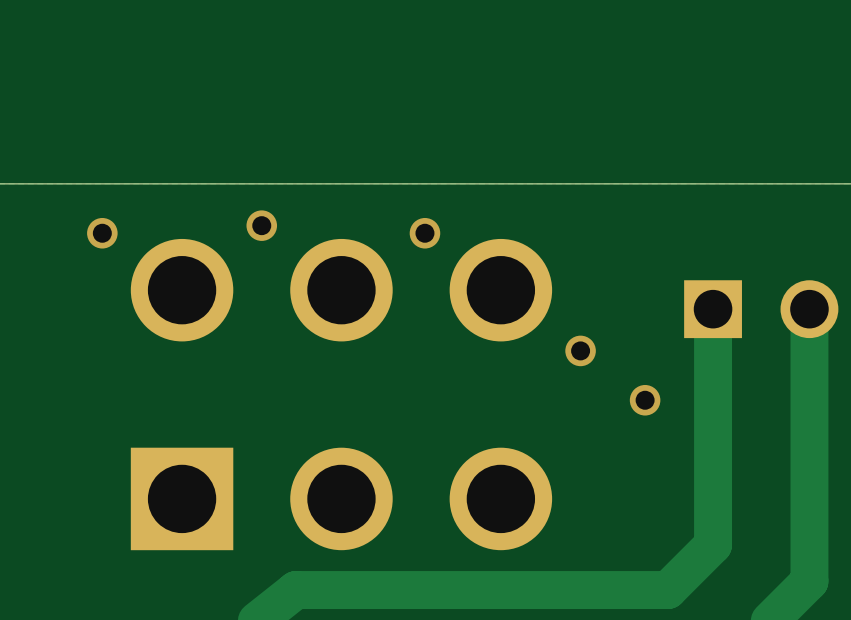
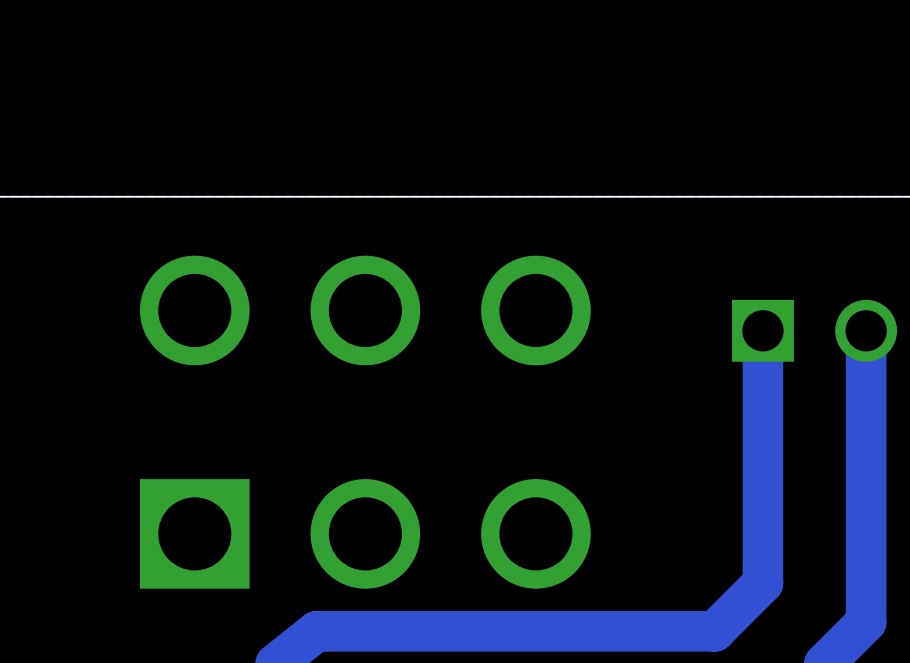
via: (261, 225) -> none
via: (102, 233) -> none
via: (424, 233) -> none
via: (580, 350) -> none
via: (645, 400) -> none

